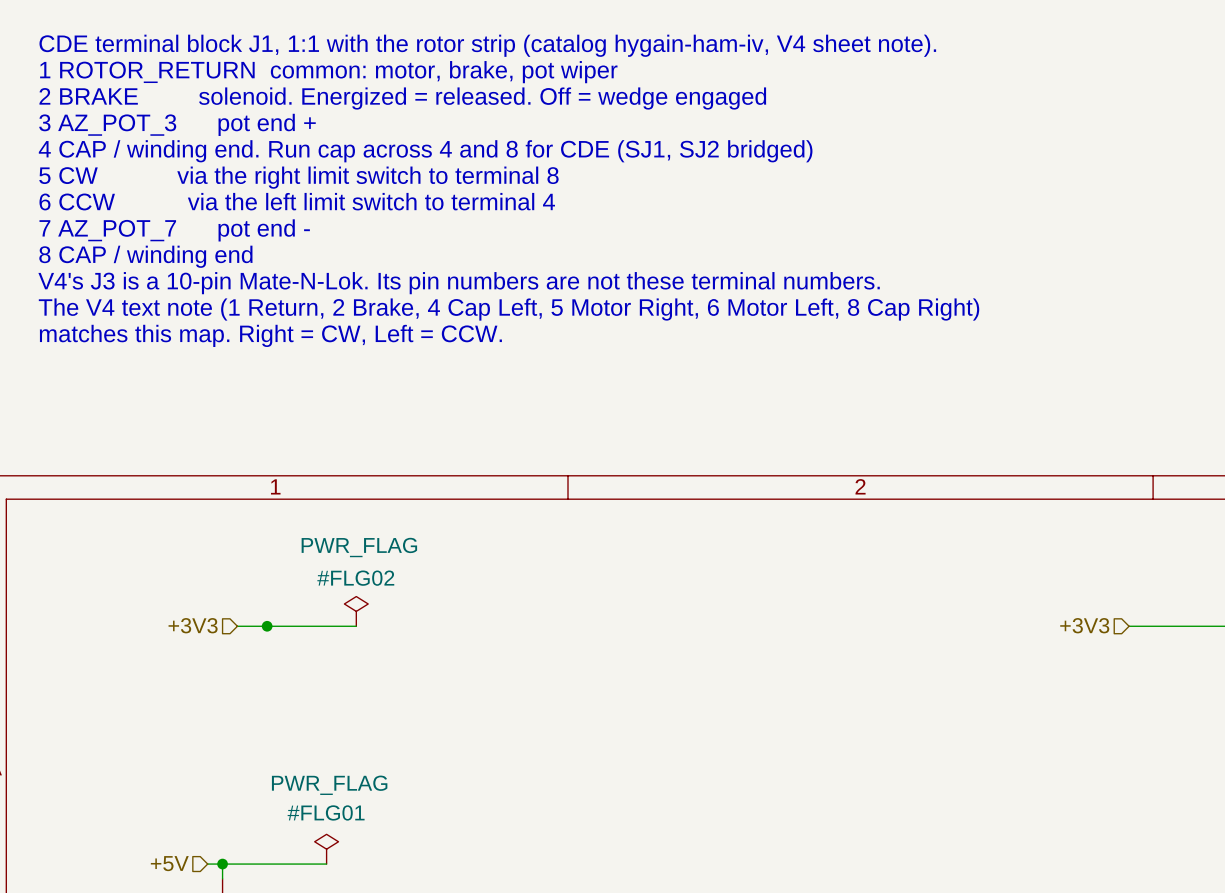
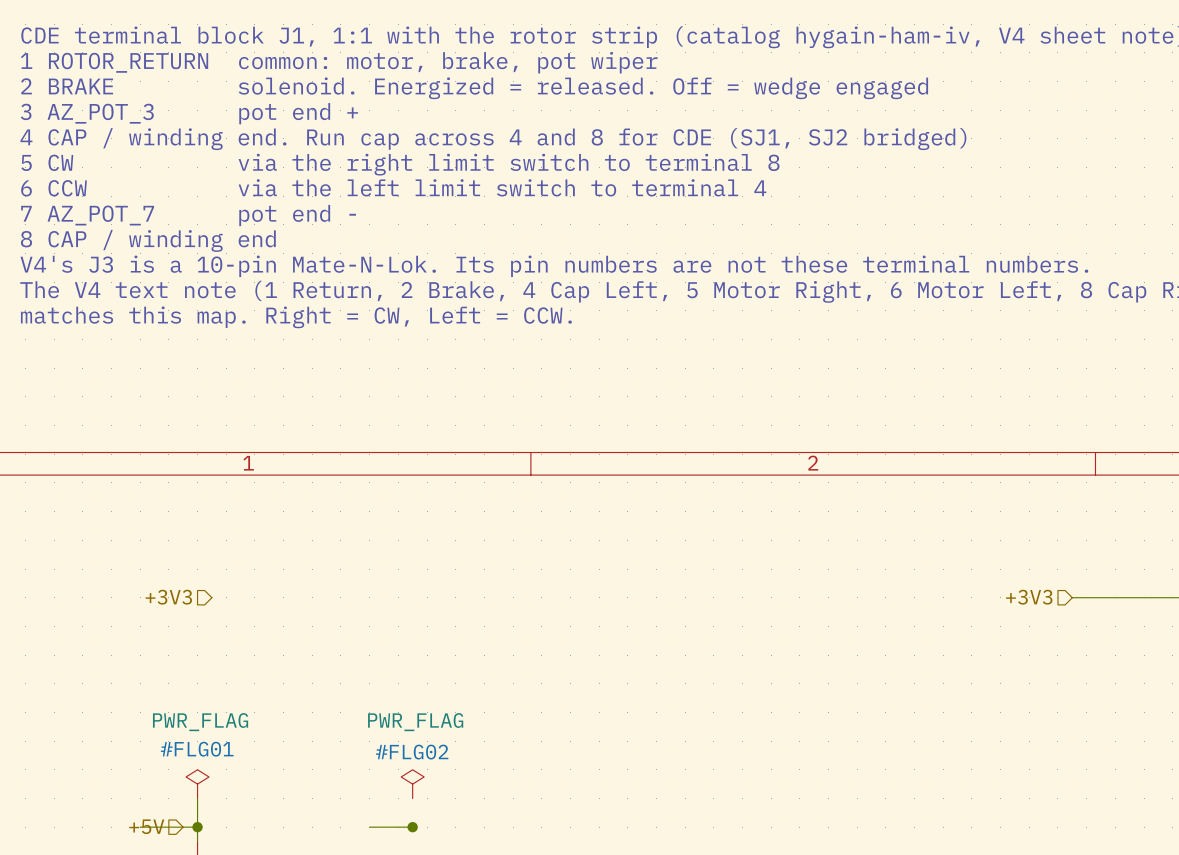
#FLG02 position: PWR_FLAG (356, 611) -> PWR_FLAG (412, 784)
wire: (237, 626) (356, 626) -> none
junction: (267, 626) -> none
#FLG01 position: PWR_FLAG (326, 849) -> PWR_FLAG (197, 784)
wire: none -> (140, 827) (183, 827)
wire: (222, 864) (326, 864) -> (197, 827) (197, 798)
wire: none -> (369, 827) (412, 827)
junction: none -> (412, 827)

